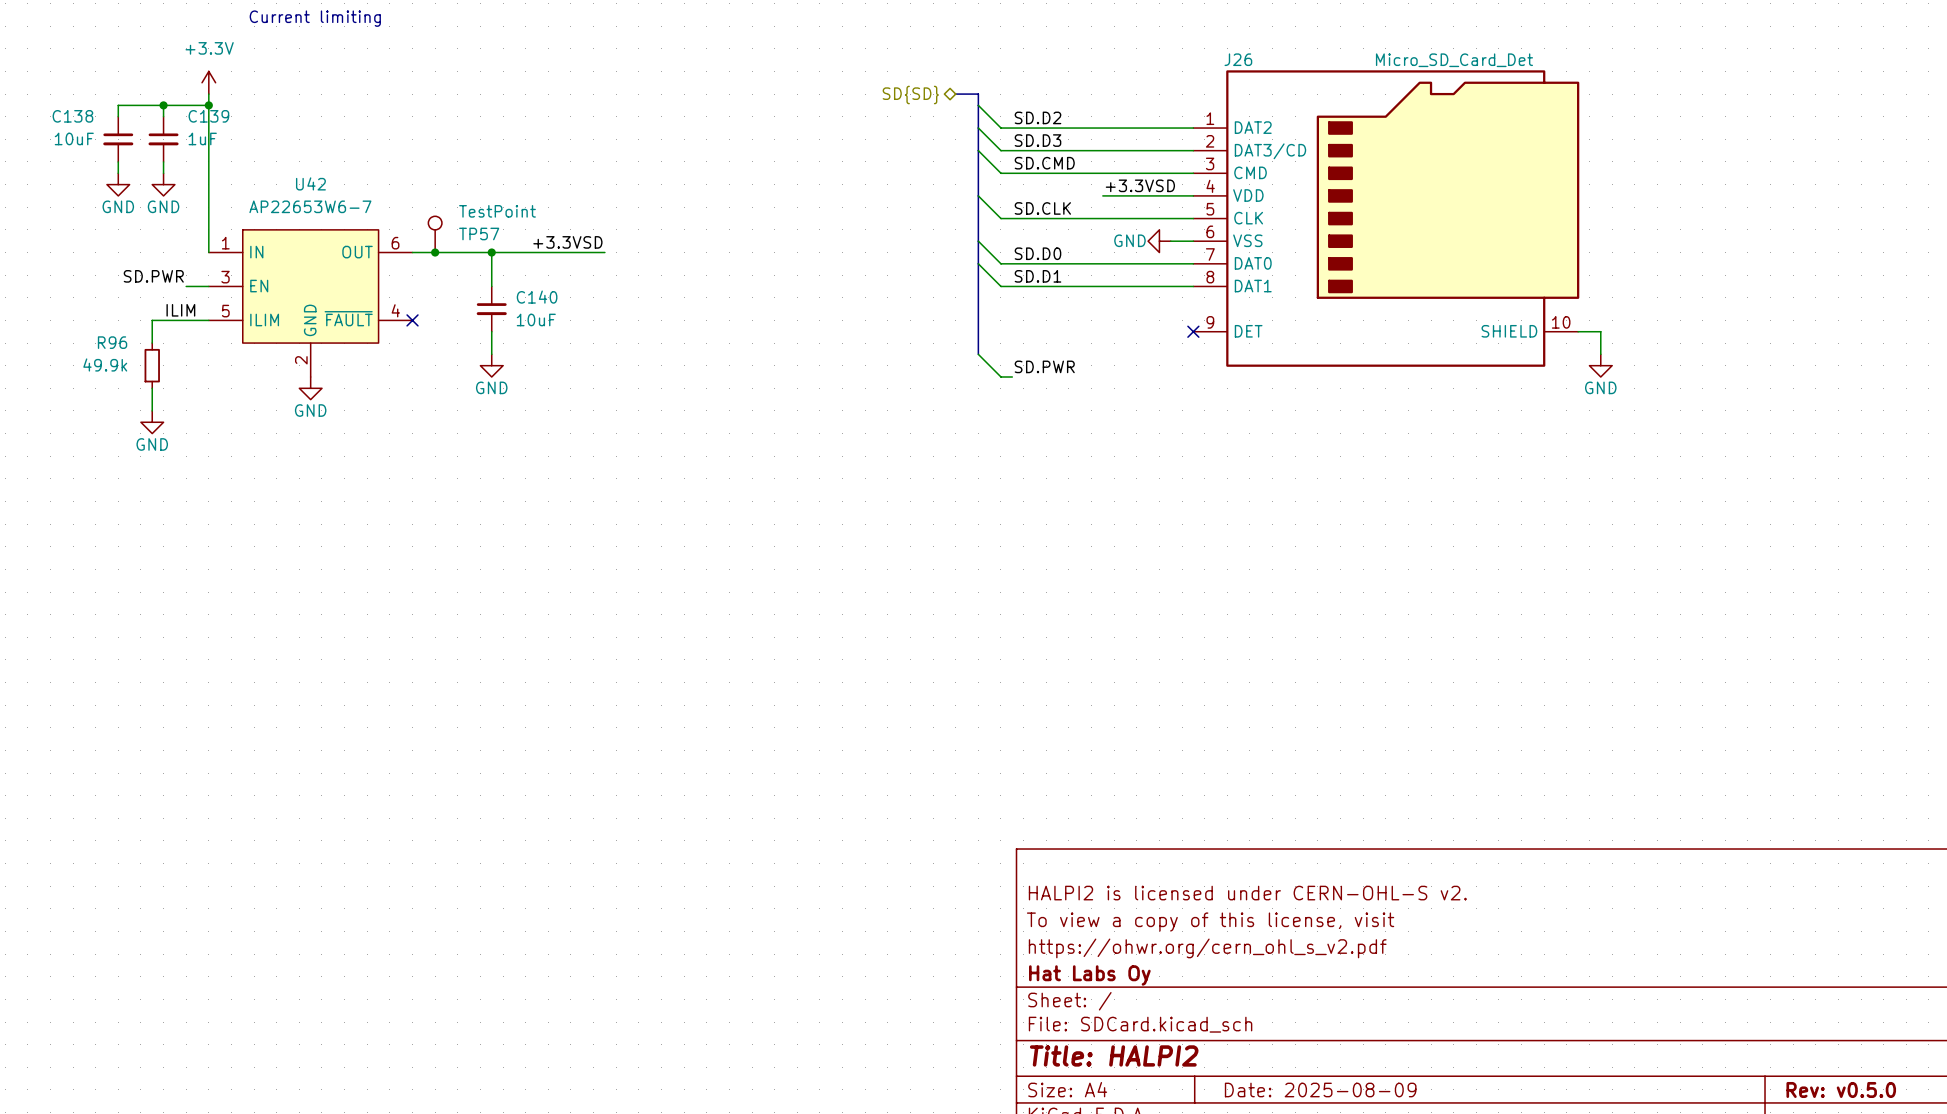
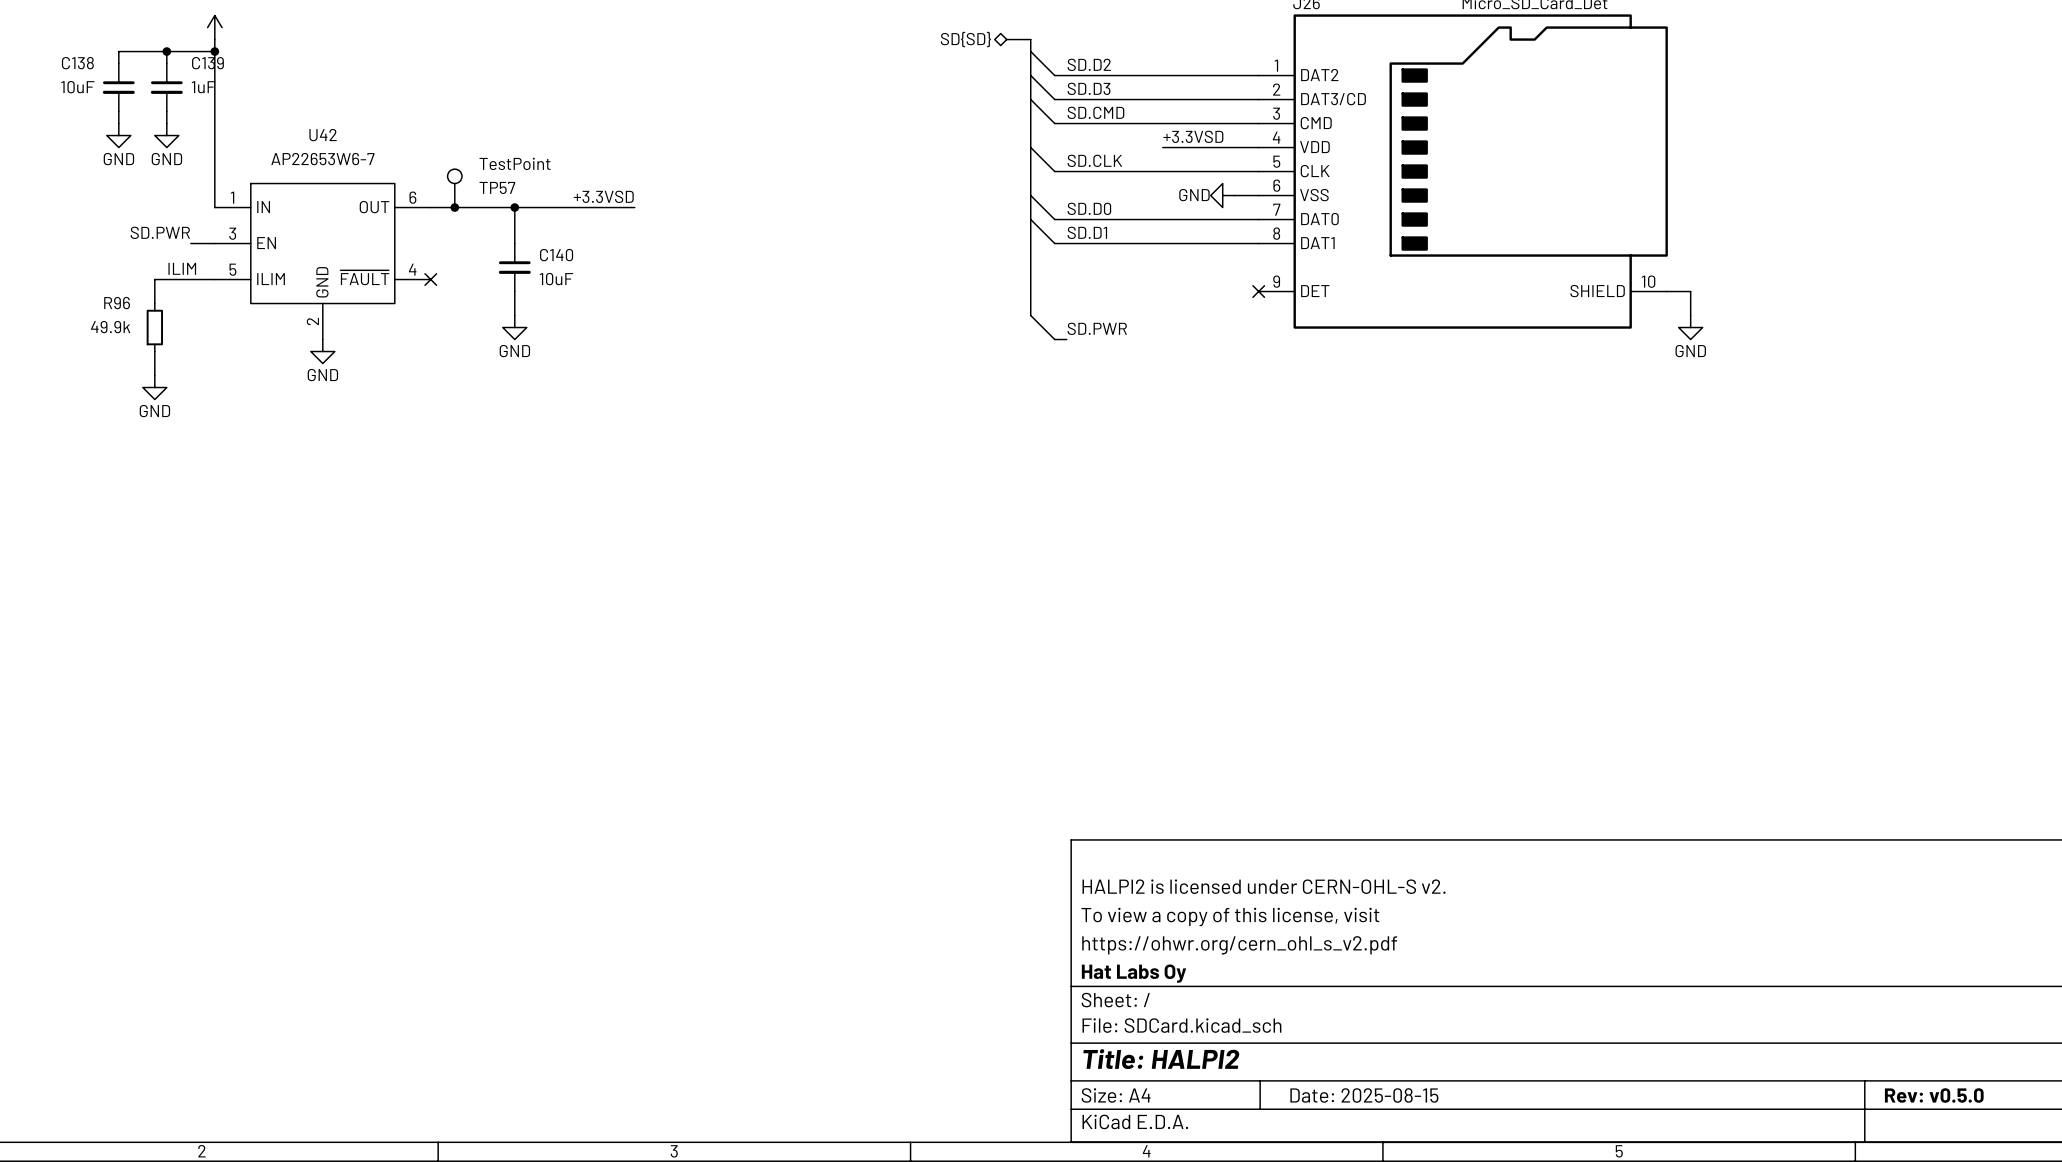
title block: Date: 2025-08-09 (1320, 1089) -> Date: 2025-08-15 (1364, 1095)

